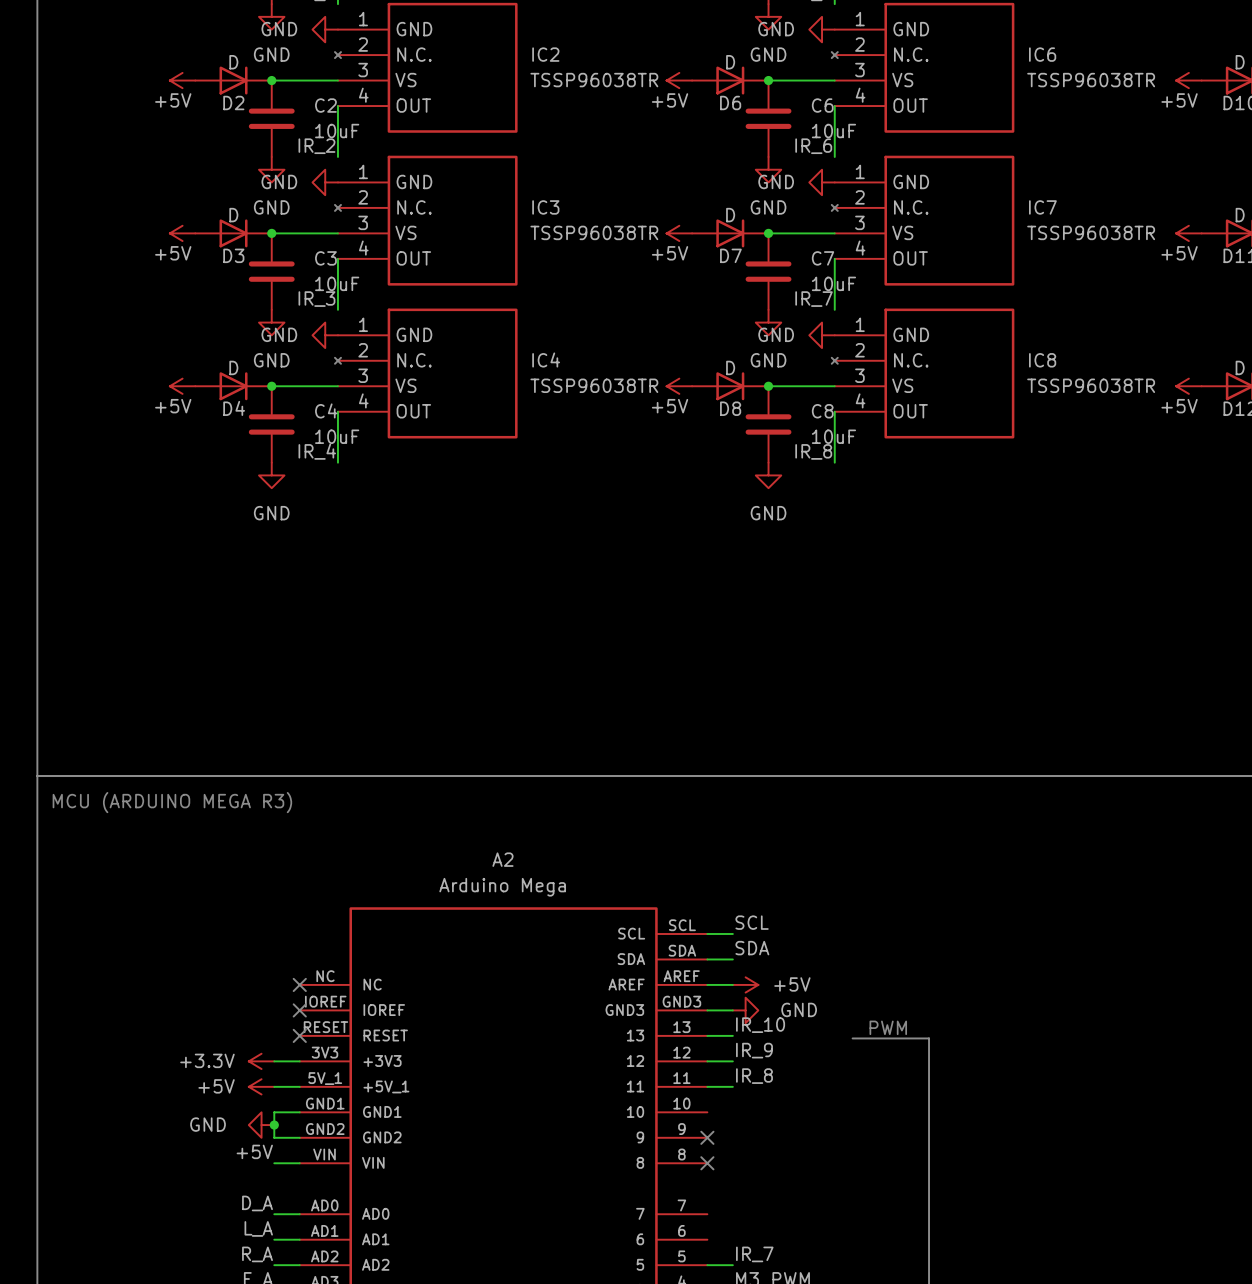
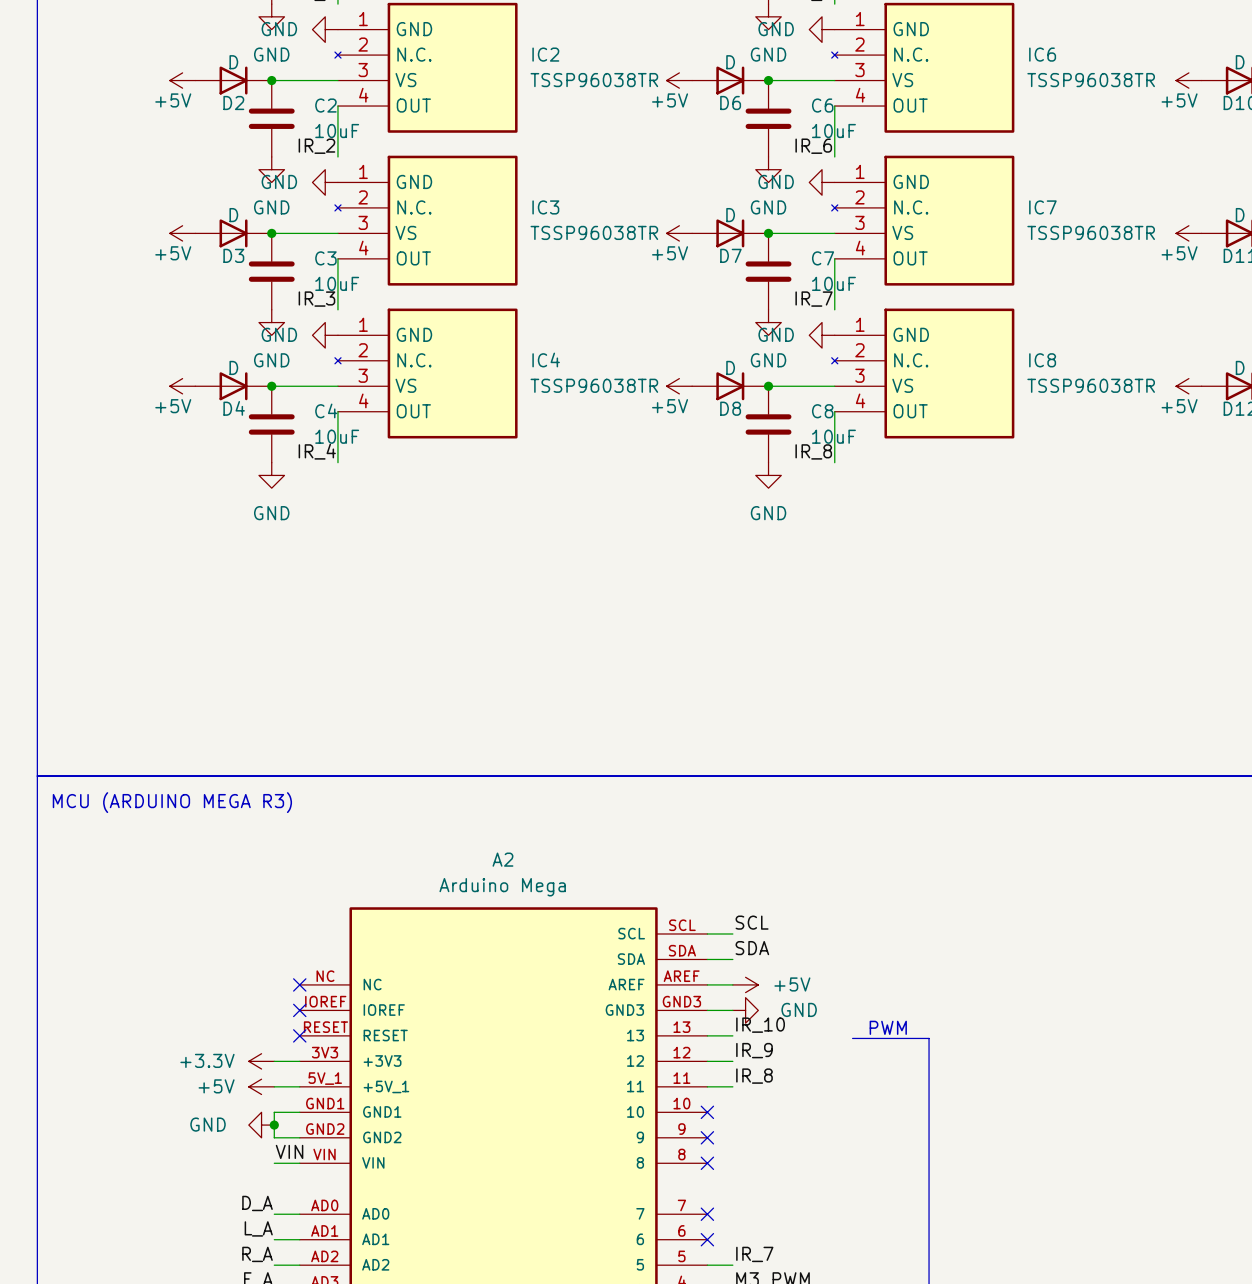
no-connect mark: none -> (707, 1112)
label: +5V (254, 1151) -> VIN (289, 1151)
no-connect mark: none -> (707, 1214)
no-connect mark: none -> (707, 1239)

